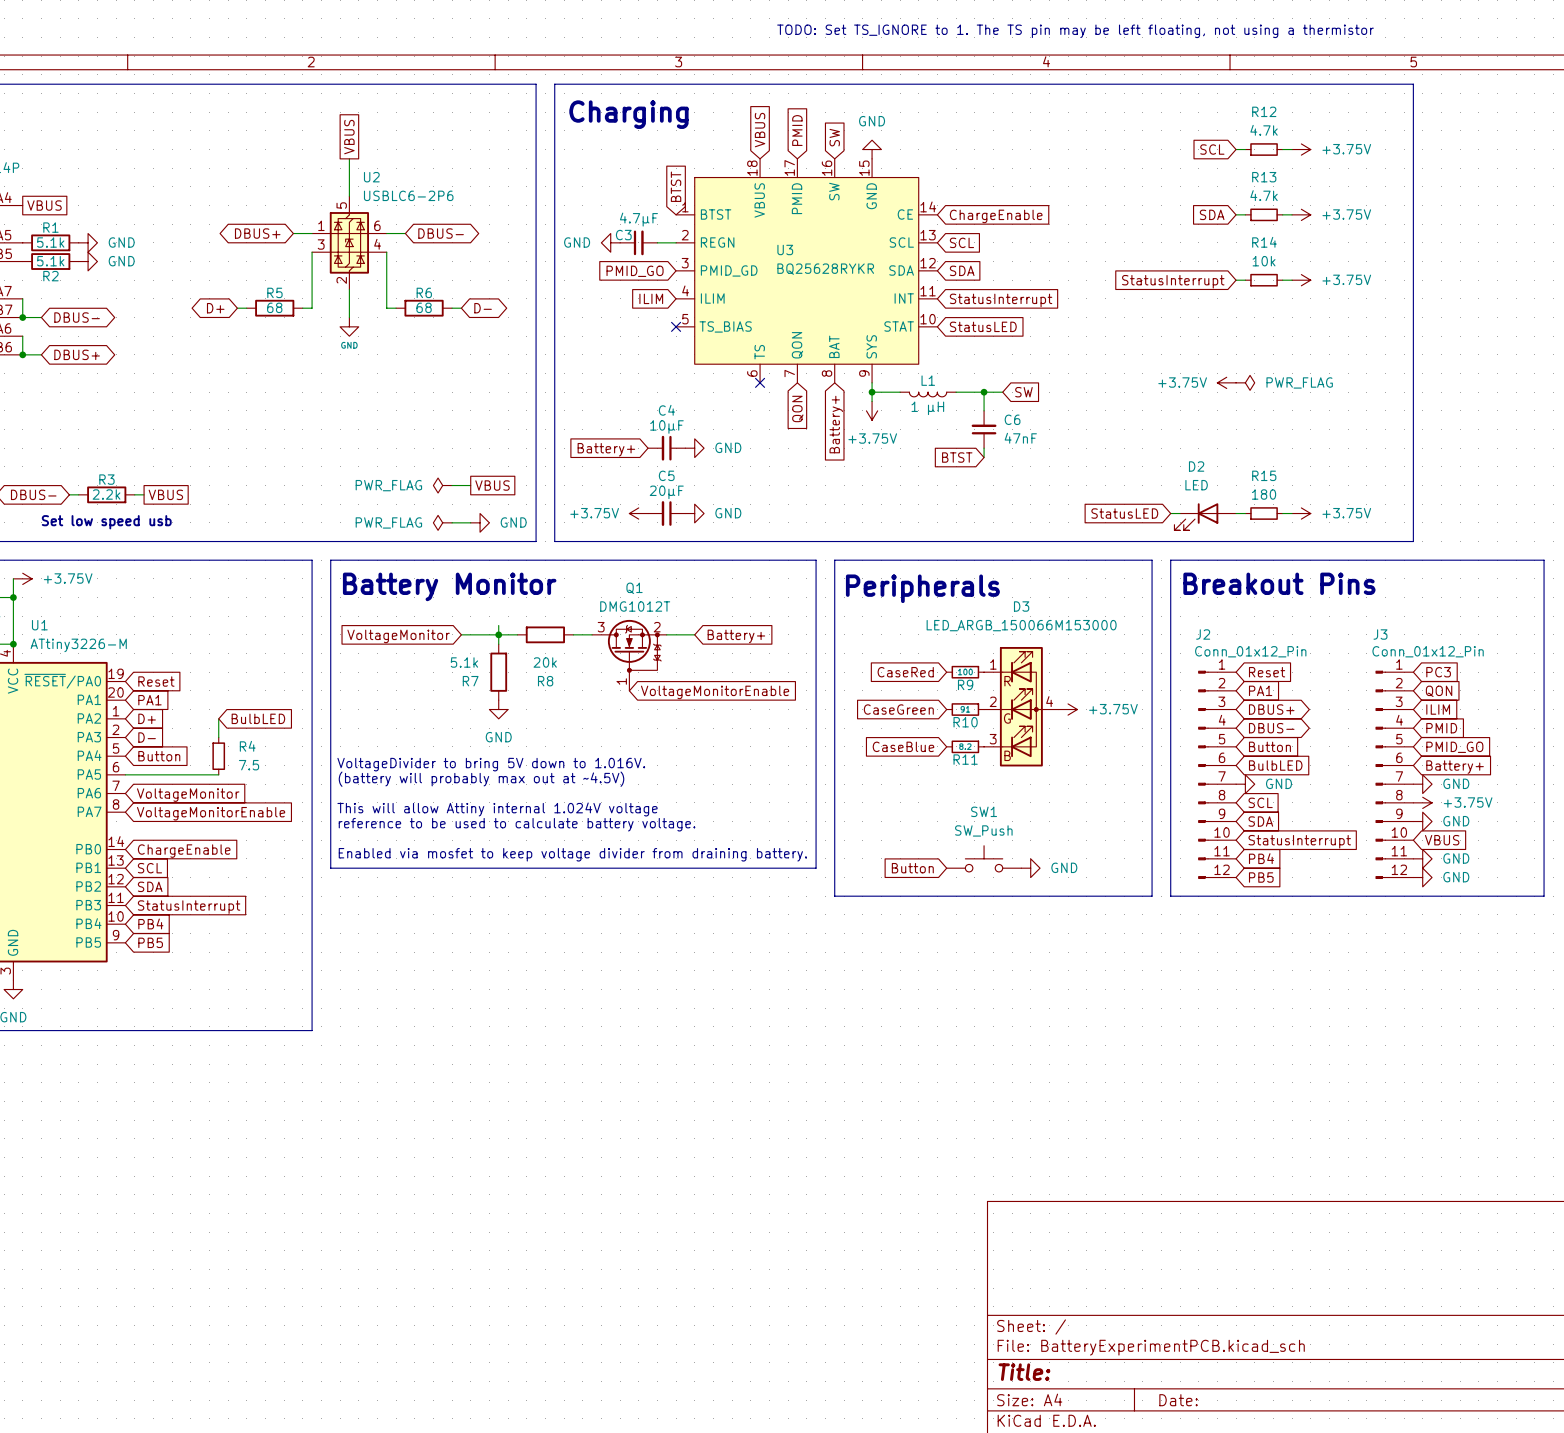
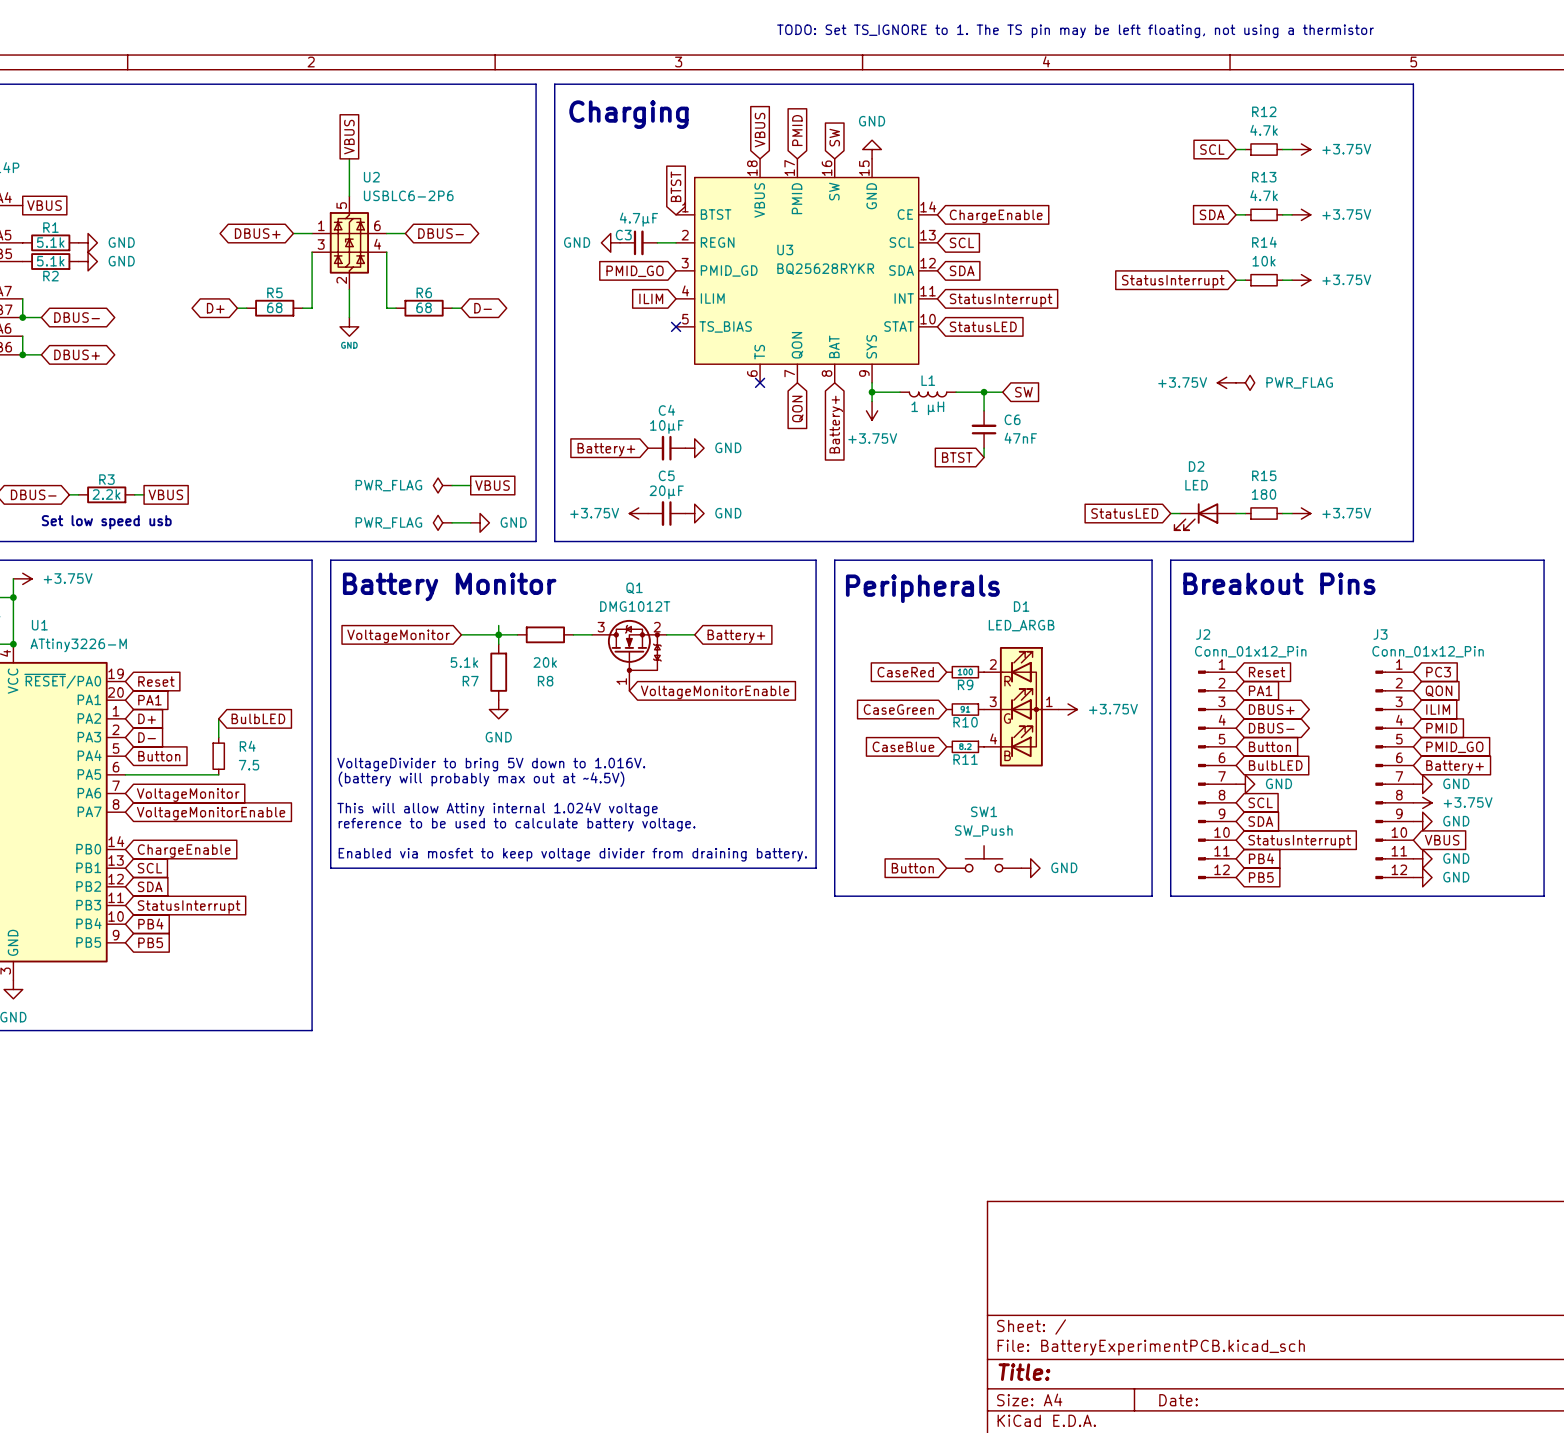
D3 name: D3 (1021, 606) -> D1 (1021, 606)
D3 value: LED_ARGB_150066M153000 (1021, 625) -> LED_ARGB (1021, 625)
D3 pin number: 1 (993, 664) -> 2 (993, 664)
D3 pin number: 2 (993, 701) -> 3 (993, 701)
D3 pin number: 4 (1049, 701) -> 1 (1049, 701)
D3 pin number: 3 (993, 739) -> 4 (993, 738)

